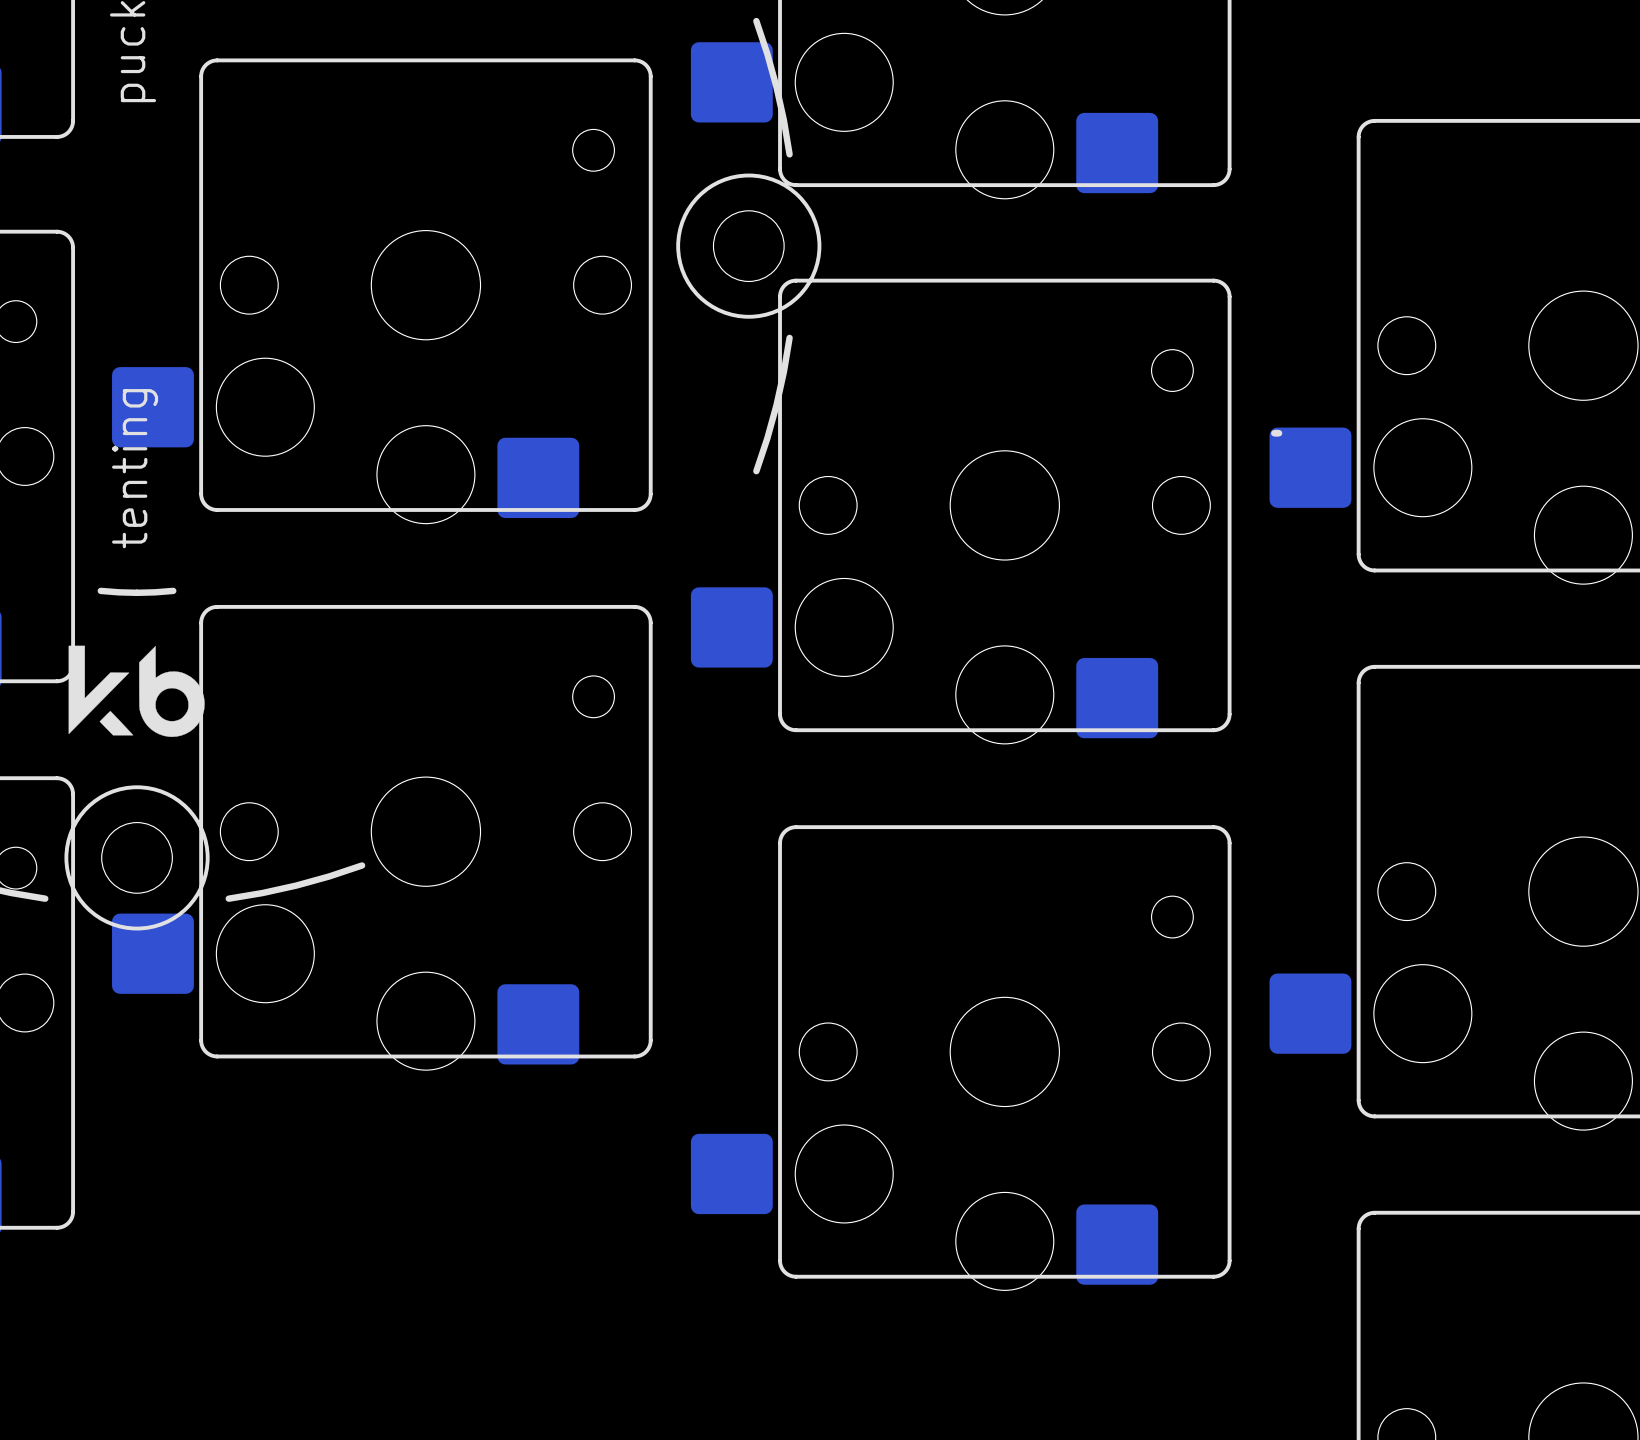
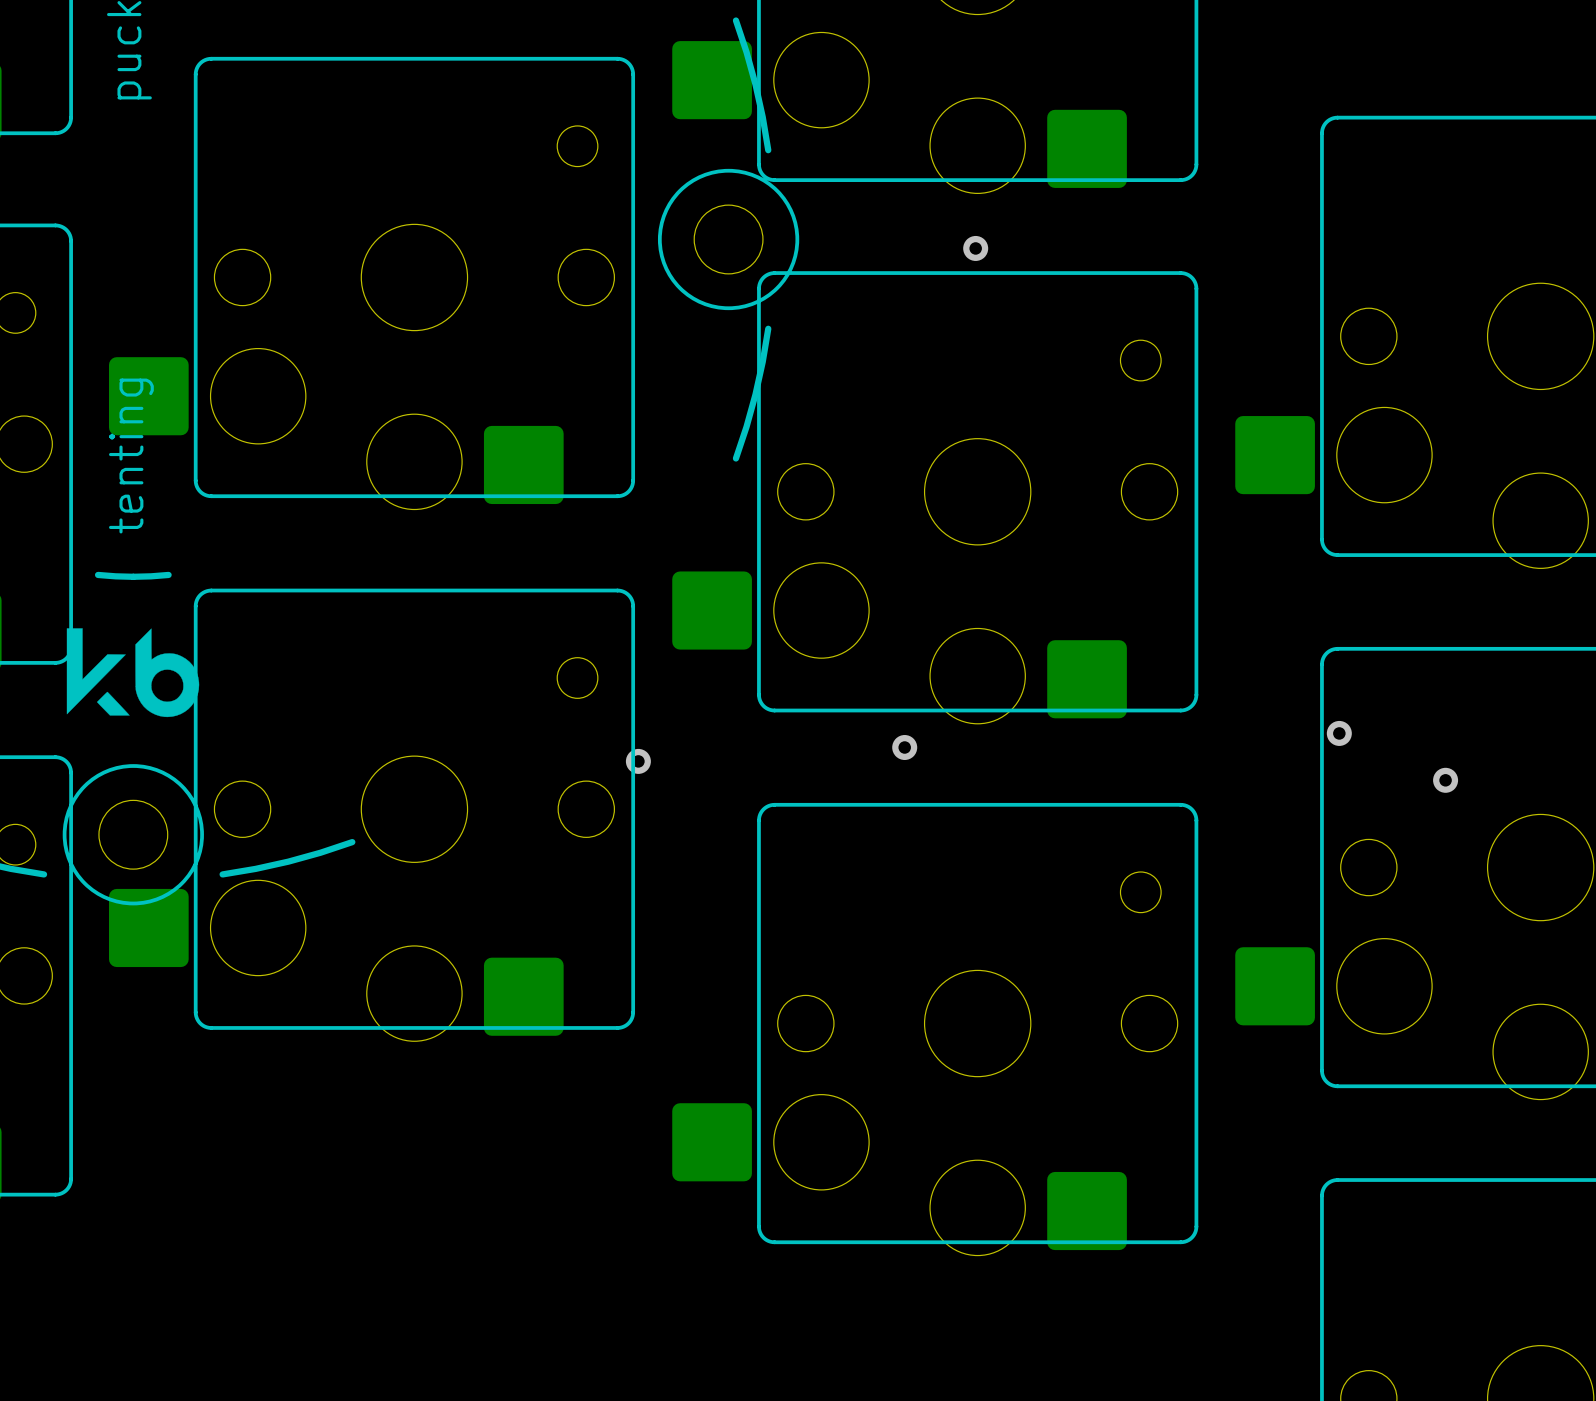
via: none -> (975, 248)
drawing: [1271, 429, 1283, 437] -> none
via: none -> (1339, 733)
via: none -> (904, 747)
via: none -> (638, 761)
via: none -> (1445, 780)

